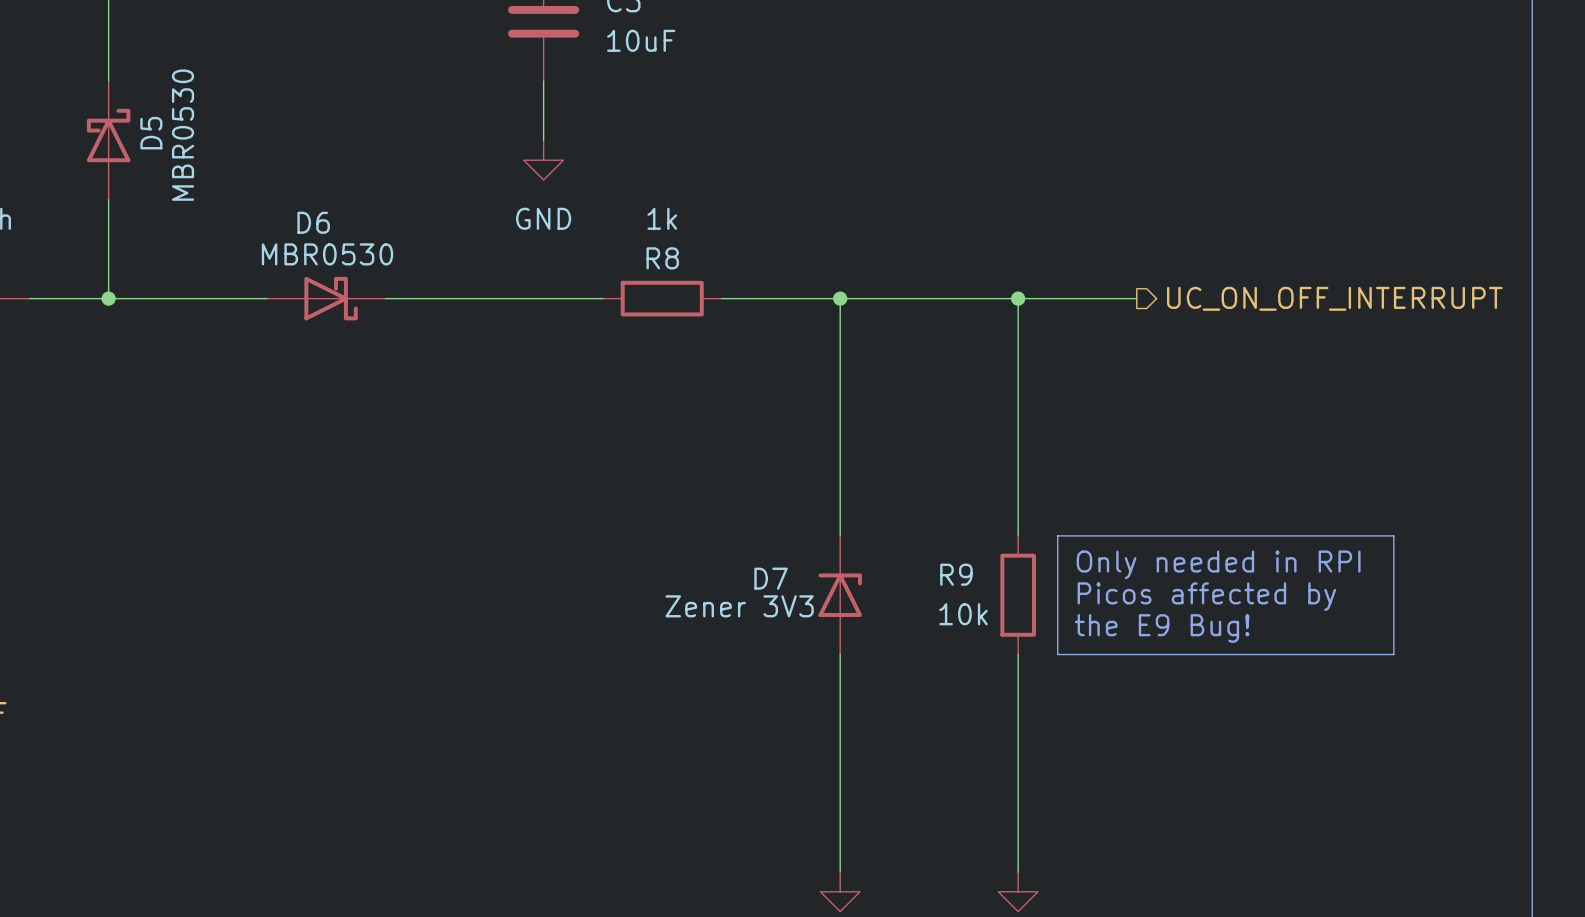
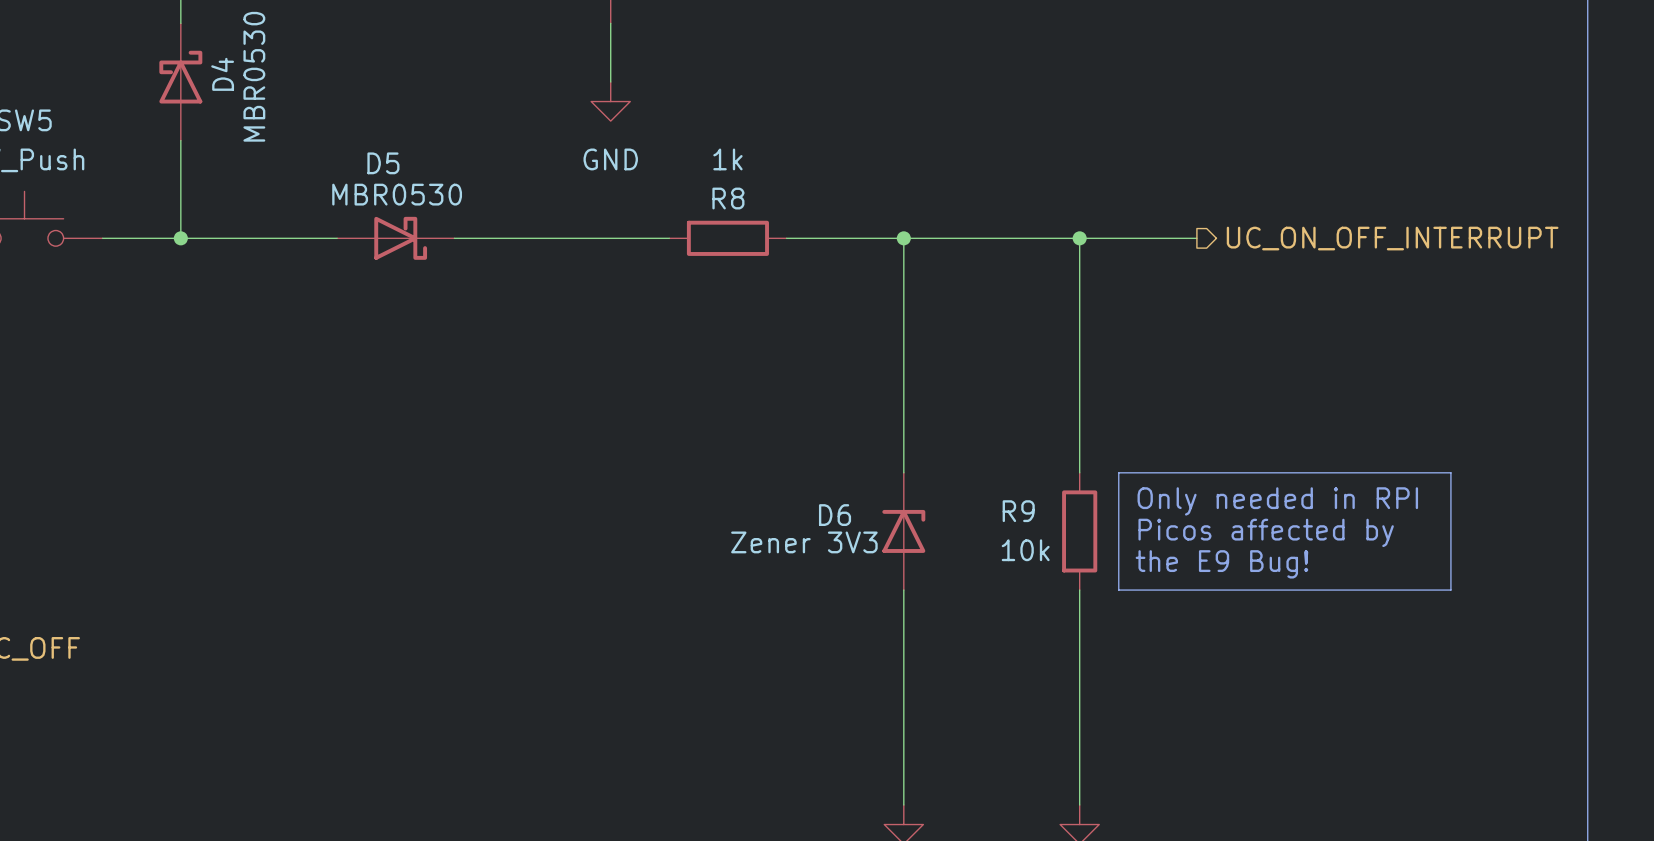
D5 name: D5 (151, 133) -> D4 (222, 74)
D6 name: D6 (313, 222) -> D5 (383, 163)
D7 name: D7 (771, 578) -> D6 (835, 515)

